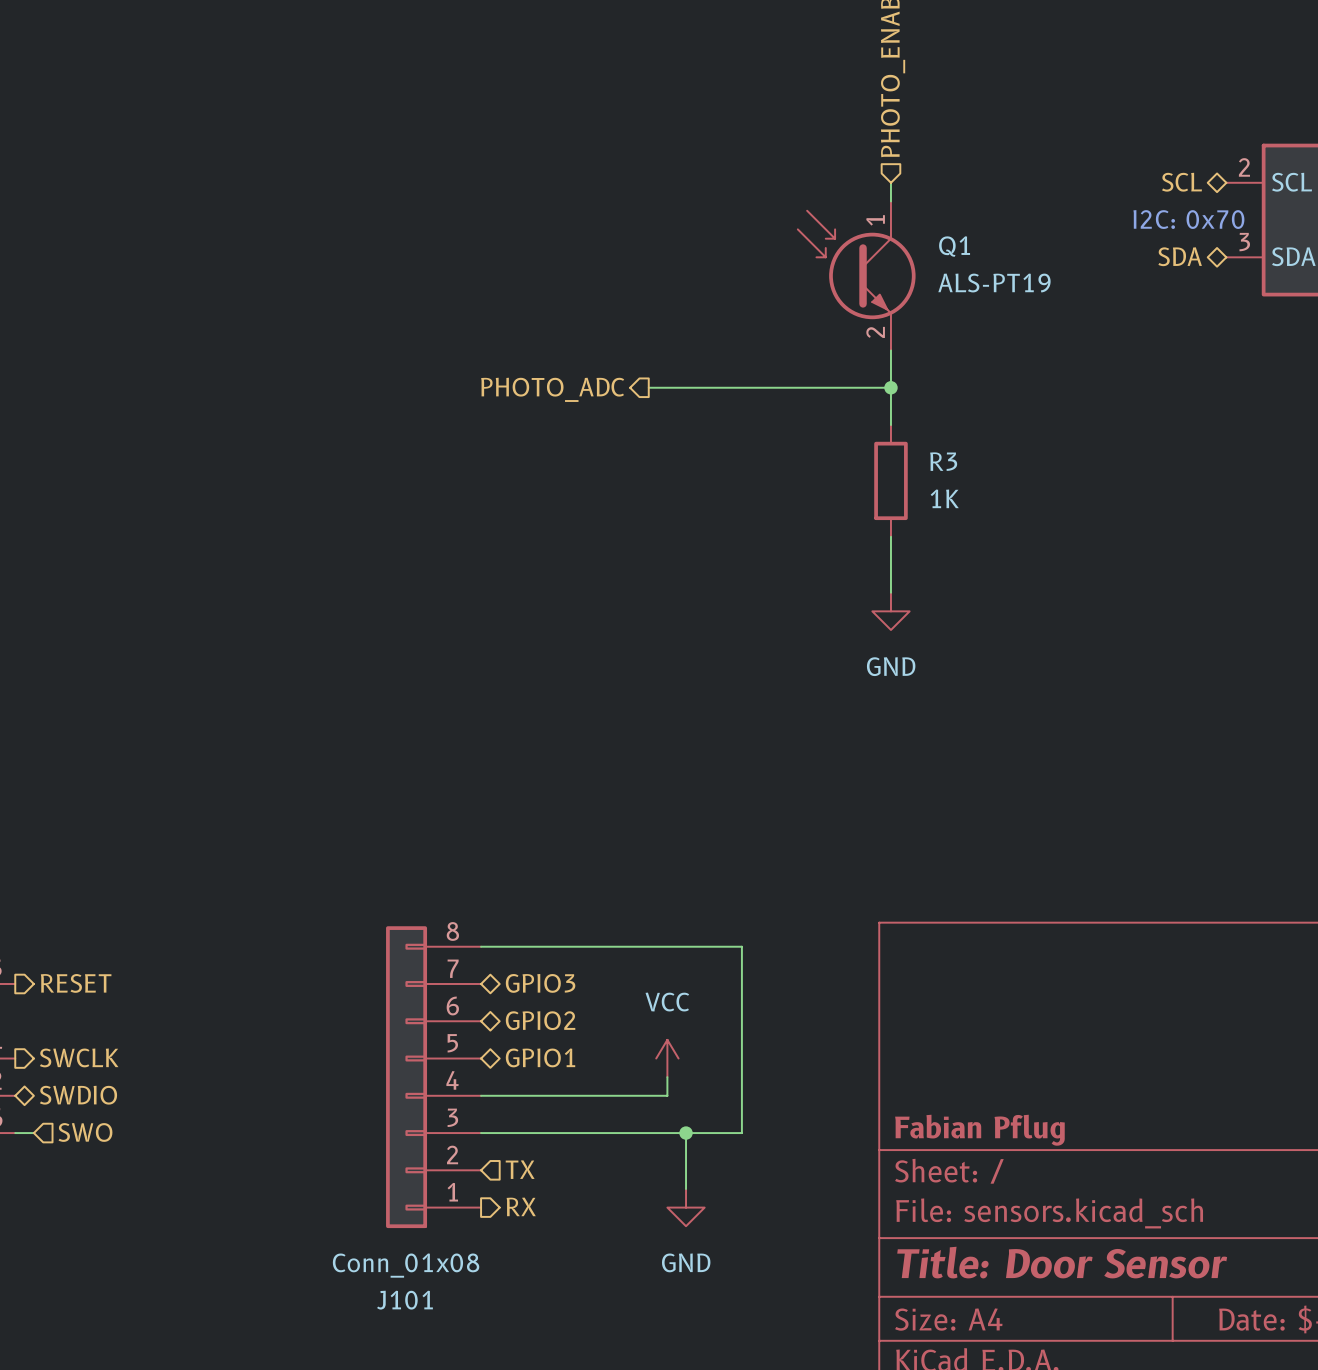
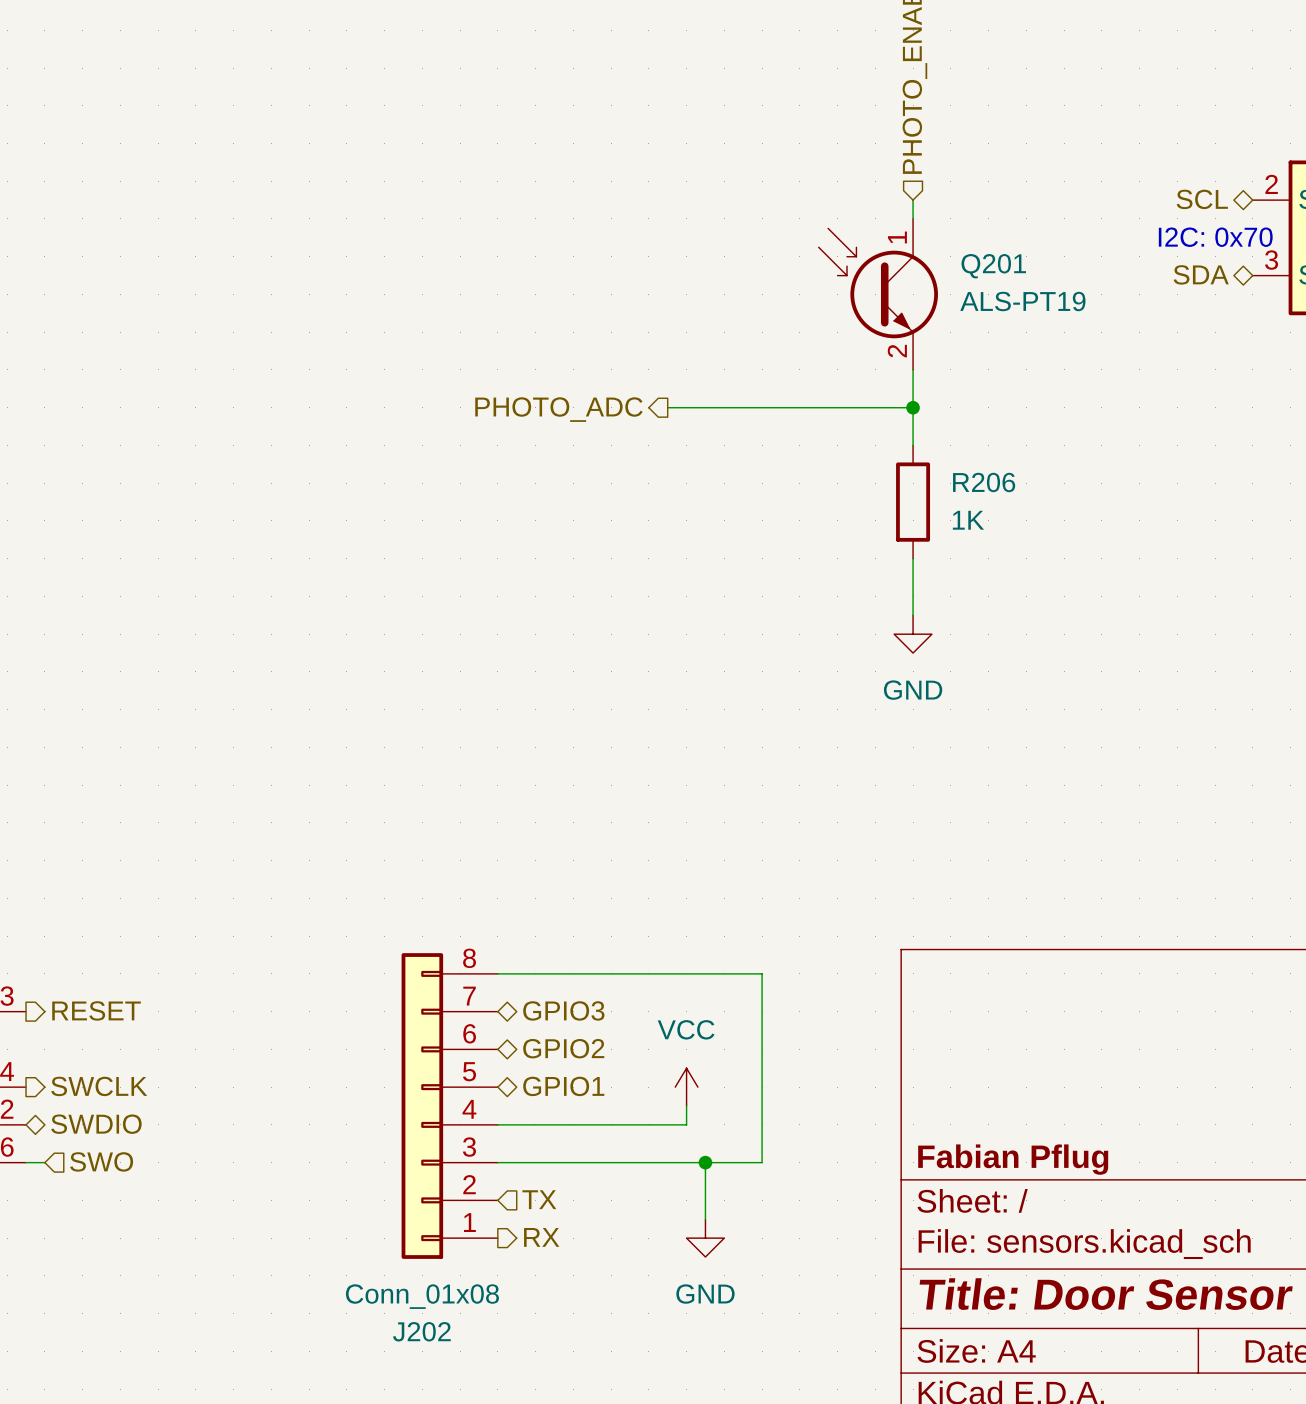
Q1 name: Q1 (954, 246) -> Q201 (993, 266)
R3 name: R3 (943, 461) -> R206 (984, 482)
J101 name: J101 (405, 1300) -> J202 (421, 1331)

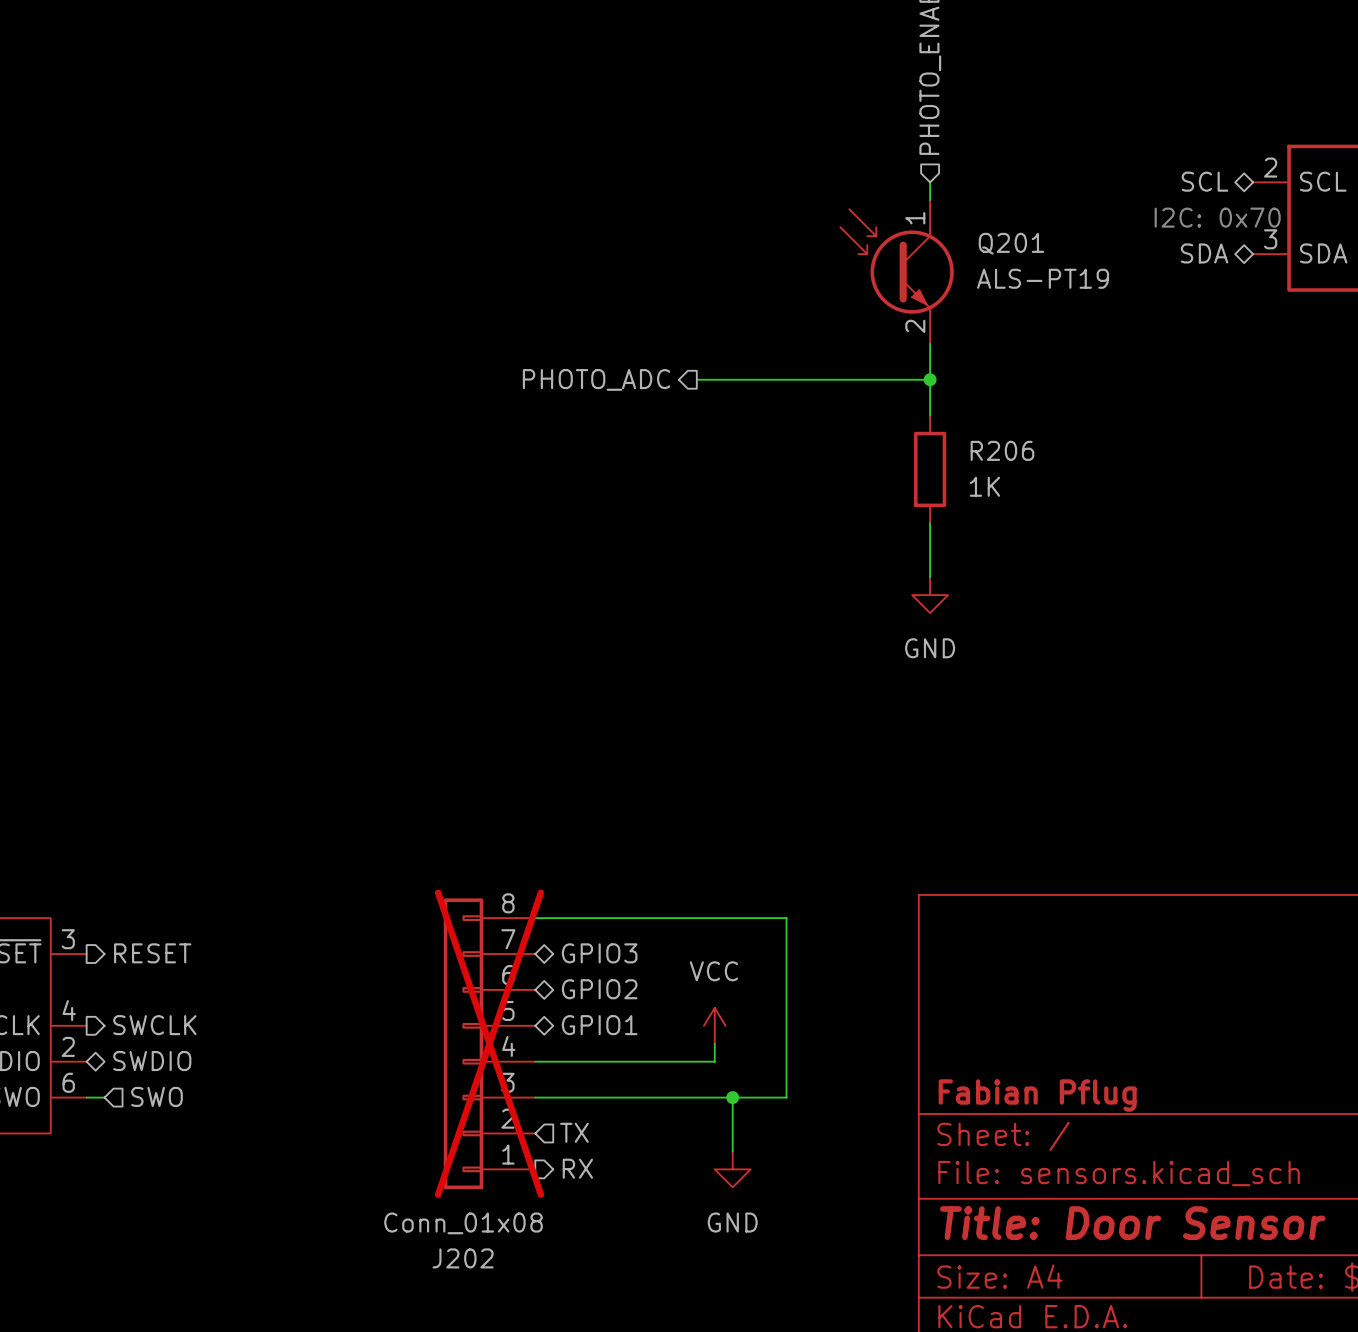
J202 do-not-place cross: none -> (489, 1043)

